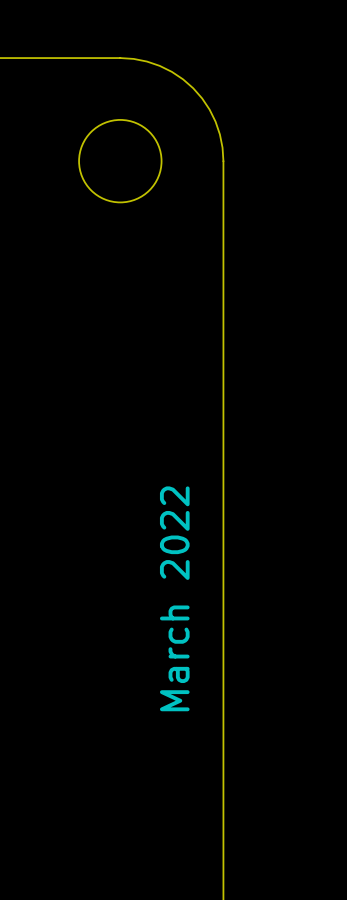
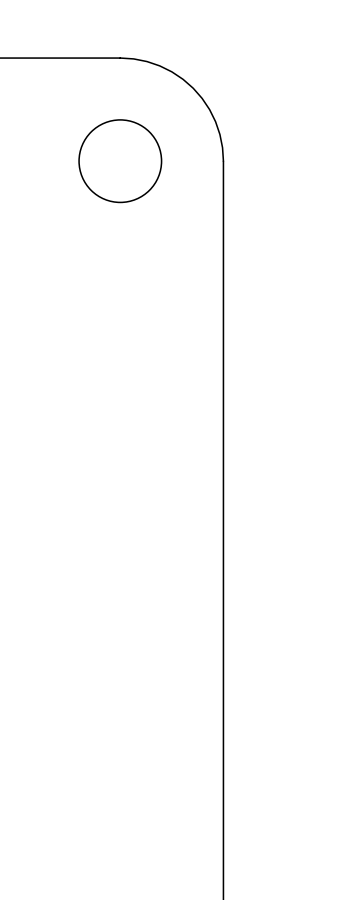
text: March 2022 (174, 598) -> none

